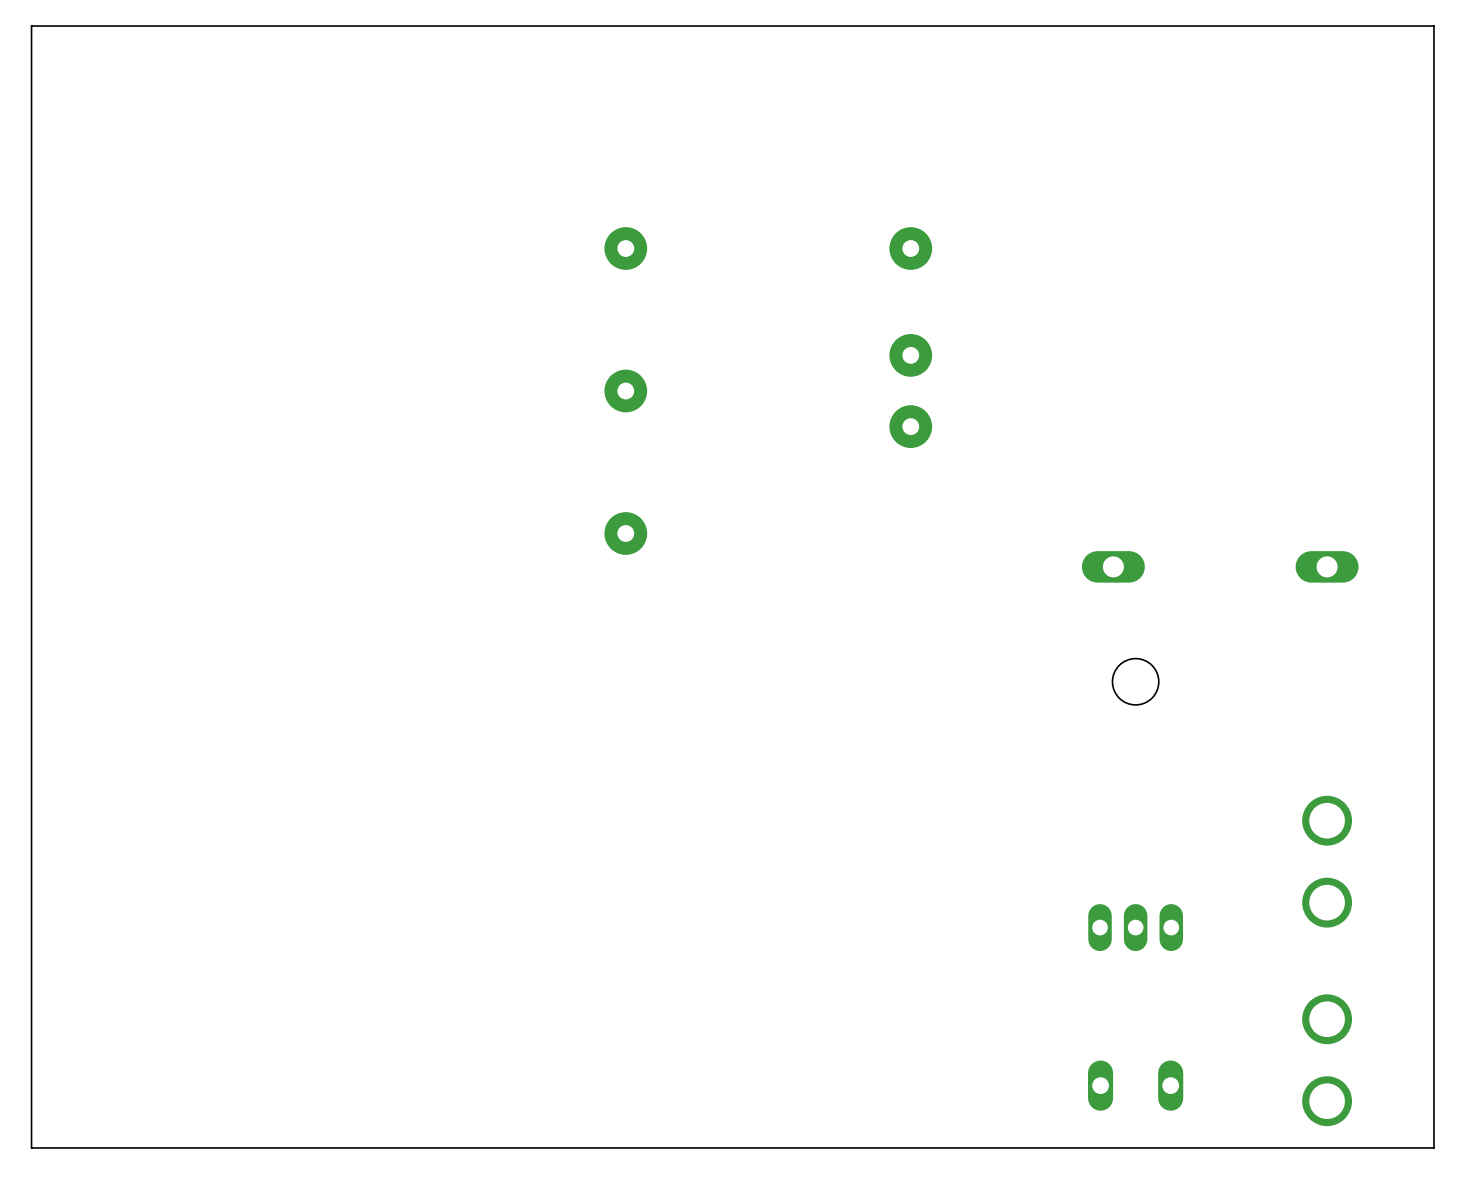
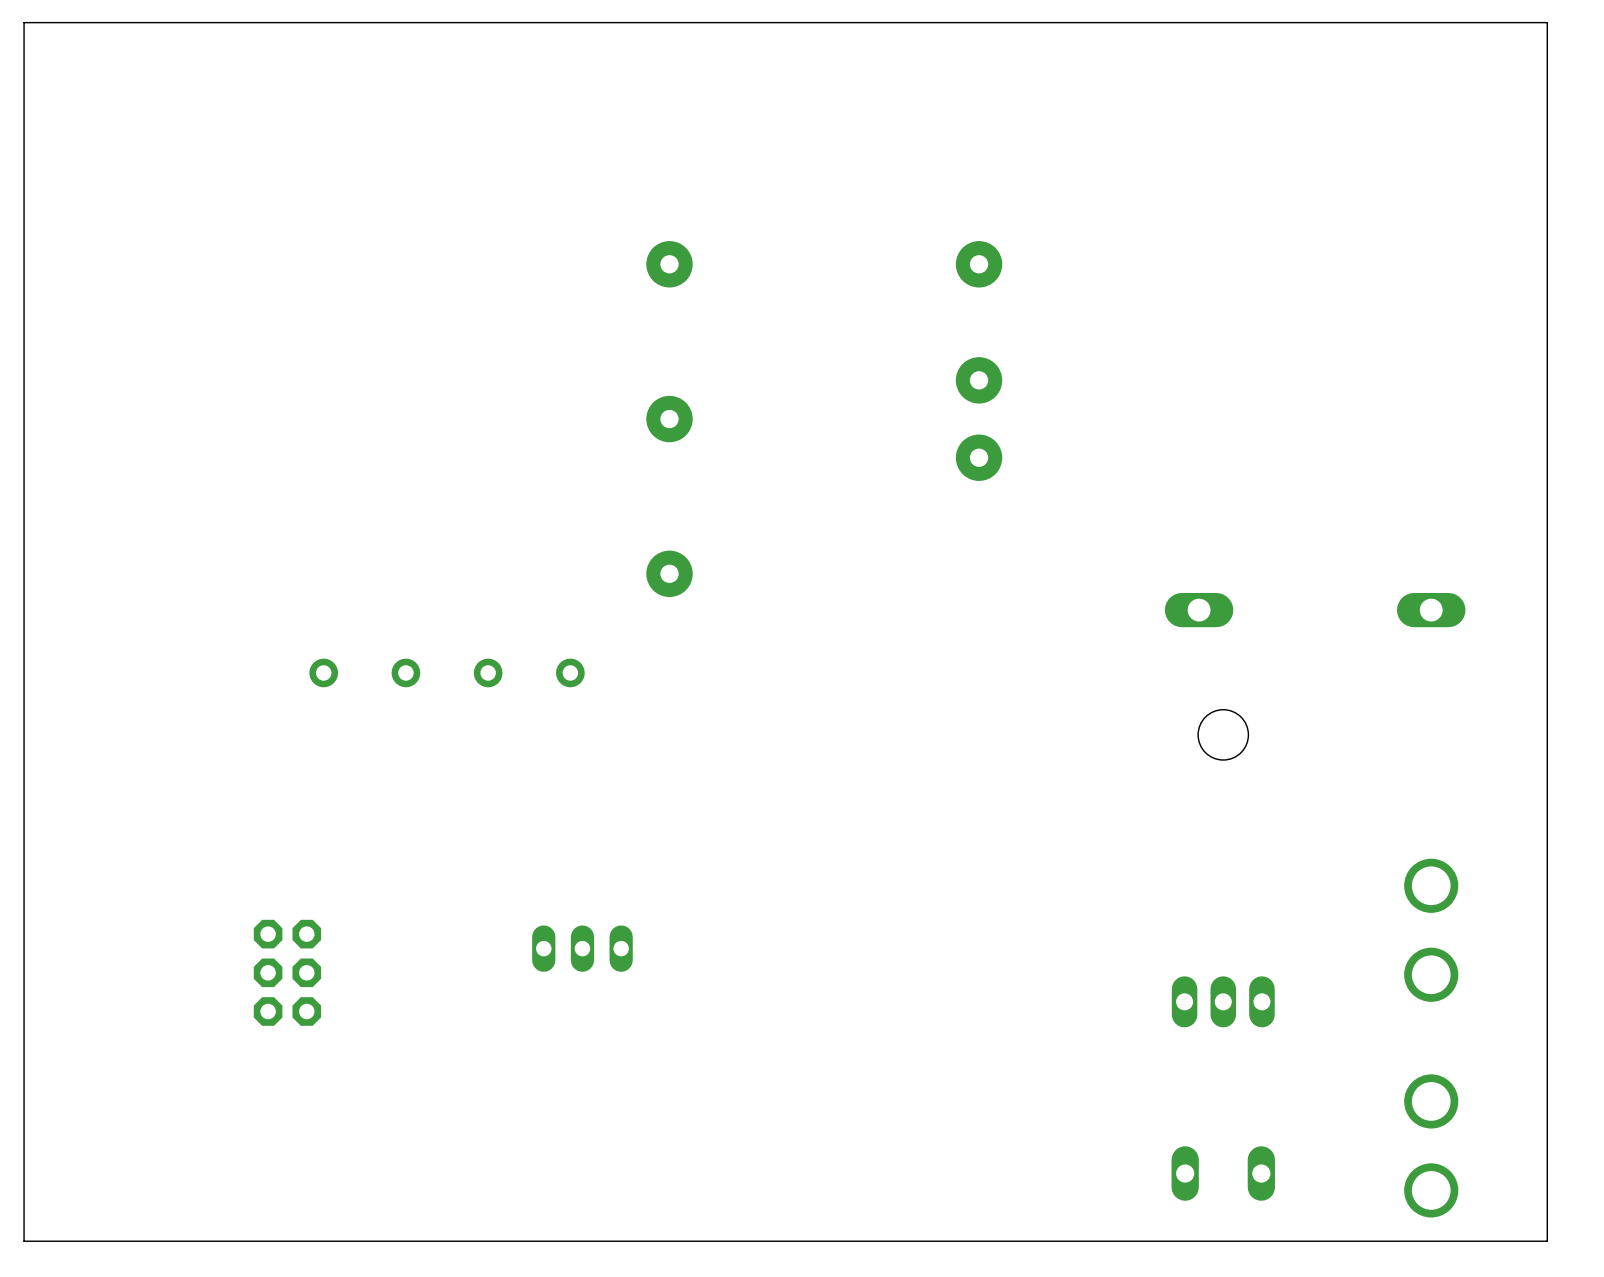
part: none -> (323, 672)
part: none -> (405, 672)
part: none -> (488, 672)
part: none -> (570, 672)
part: none -> (582, 948)
part: none -> (287, 972)

